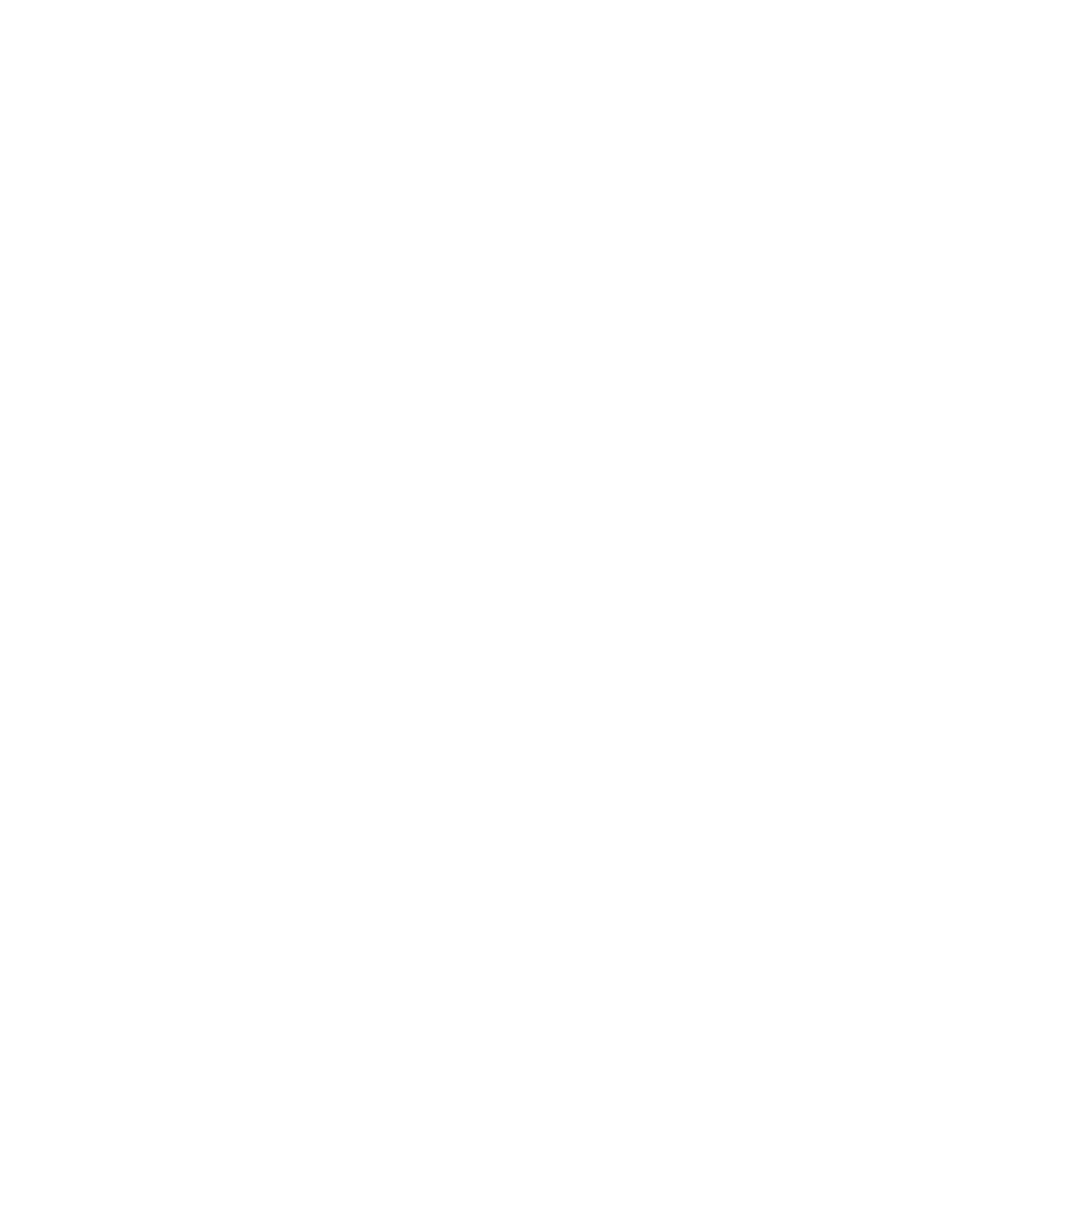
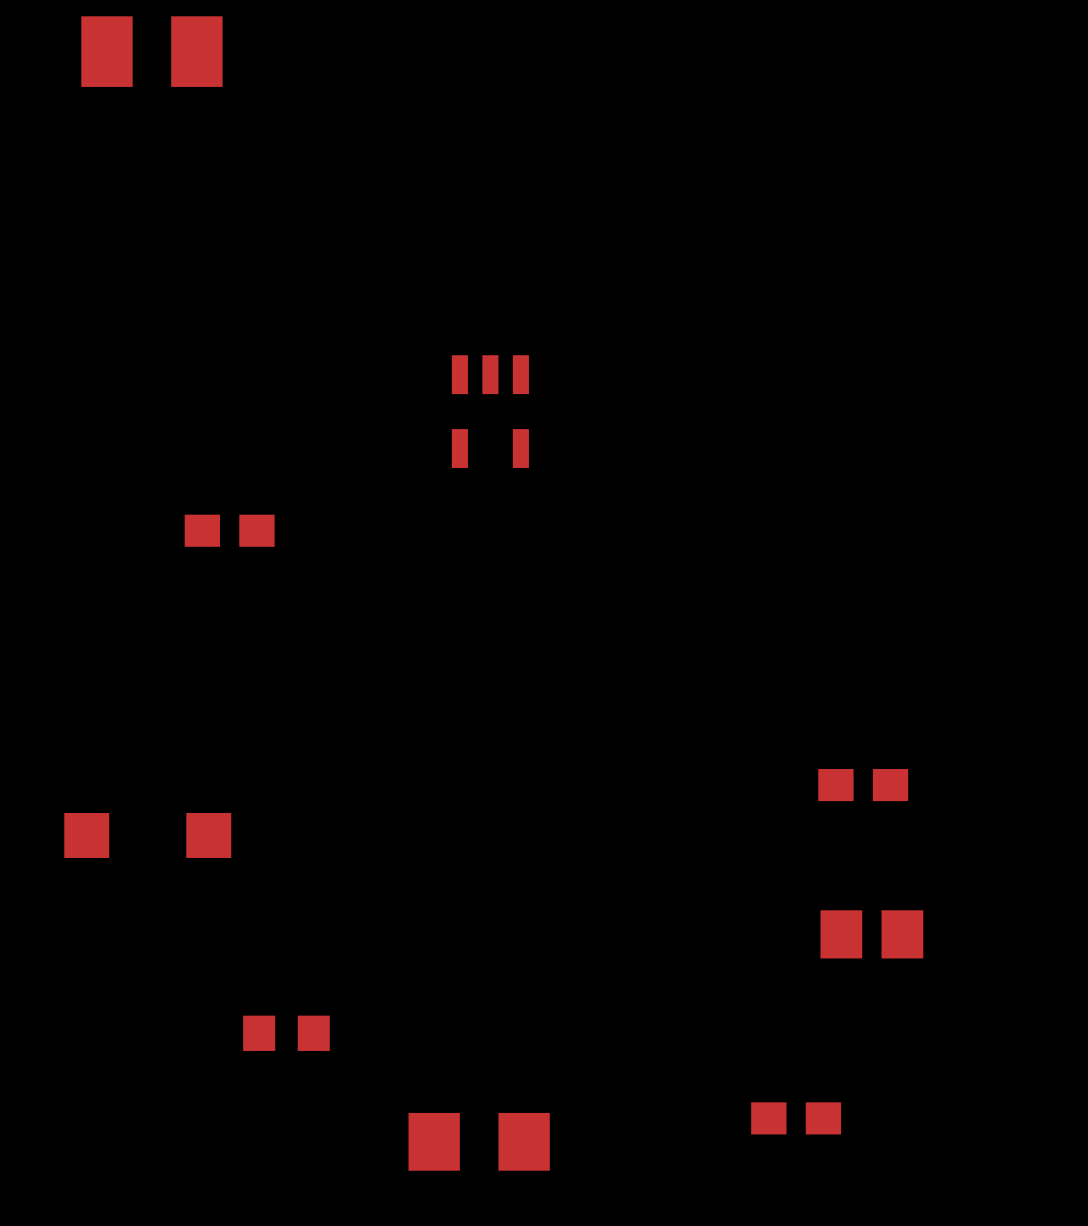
part: none -> (151, 51)
part: none -> (490, 411)
part: none -> (229, 530)
part: none -> (863, 785)
part: none -> (147, 835)
part: none -> (871, 934)
part: none -> (286, 1033)
part: none -> (796, 1118)
part: none -> (479, 1141)

